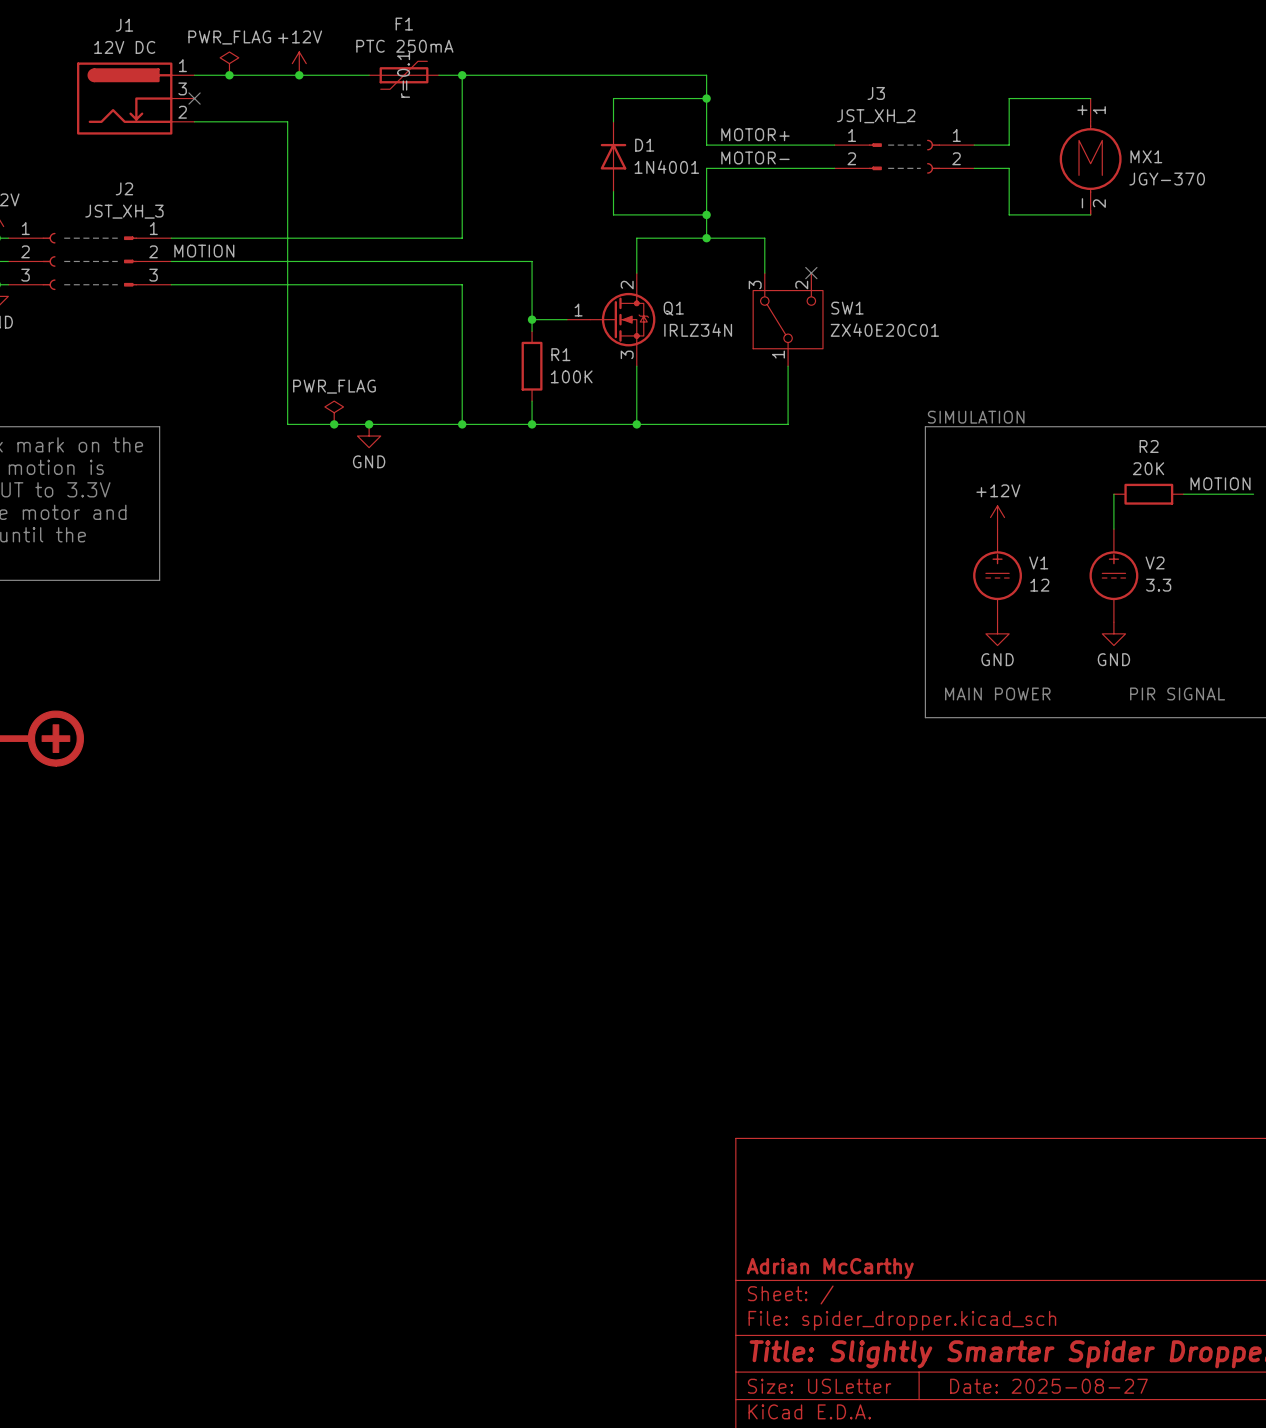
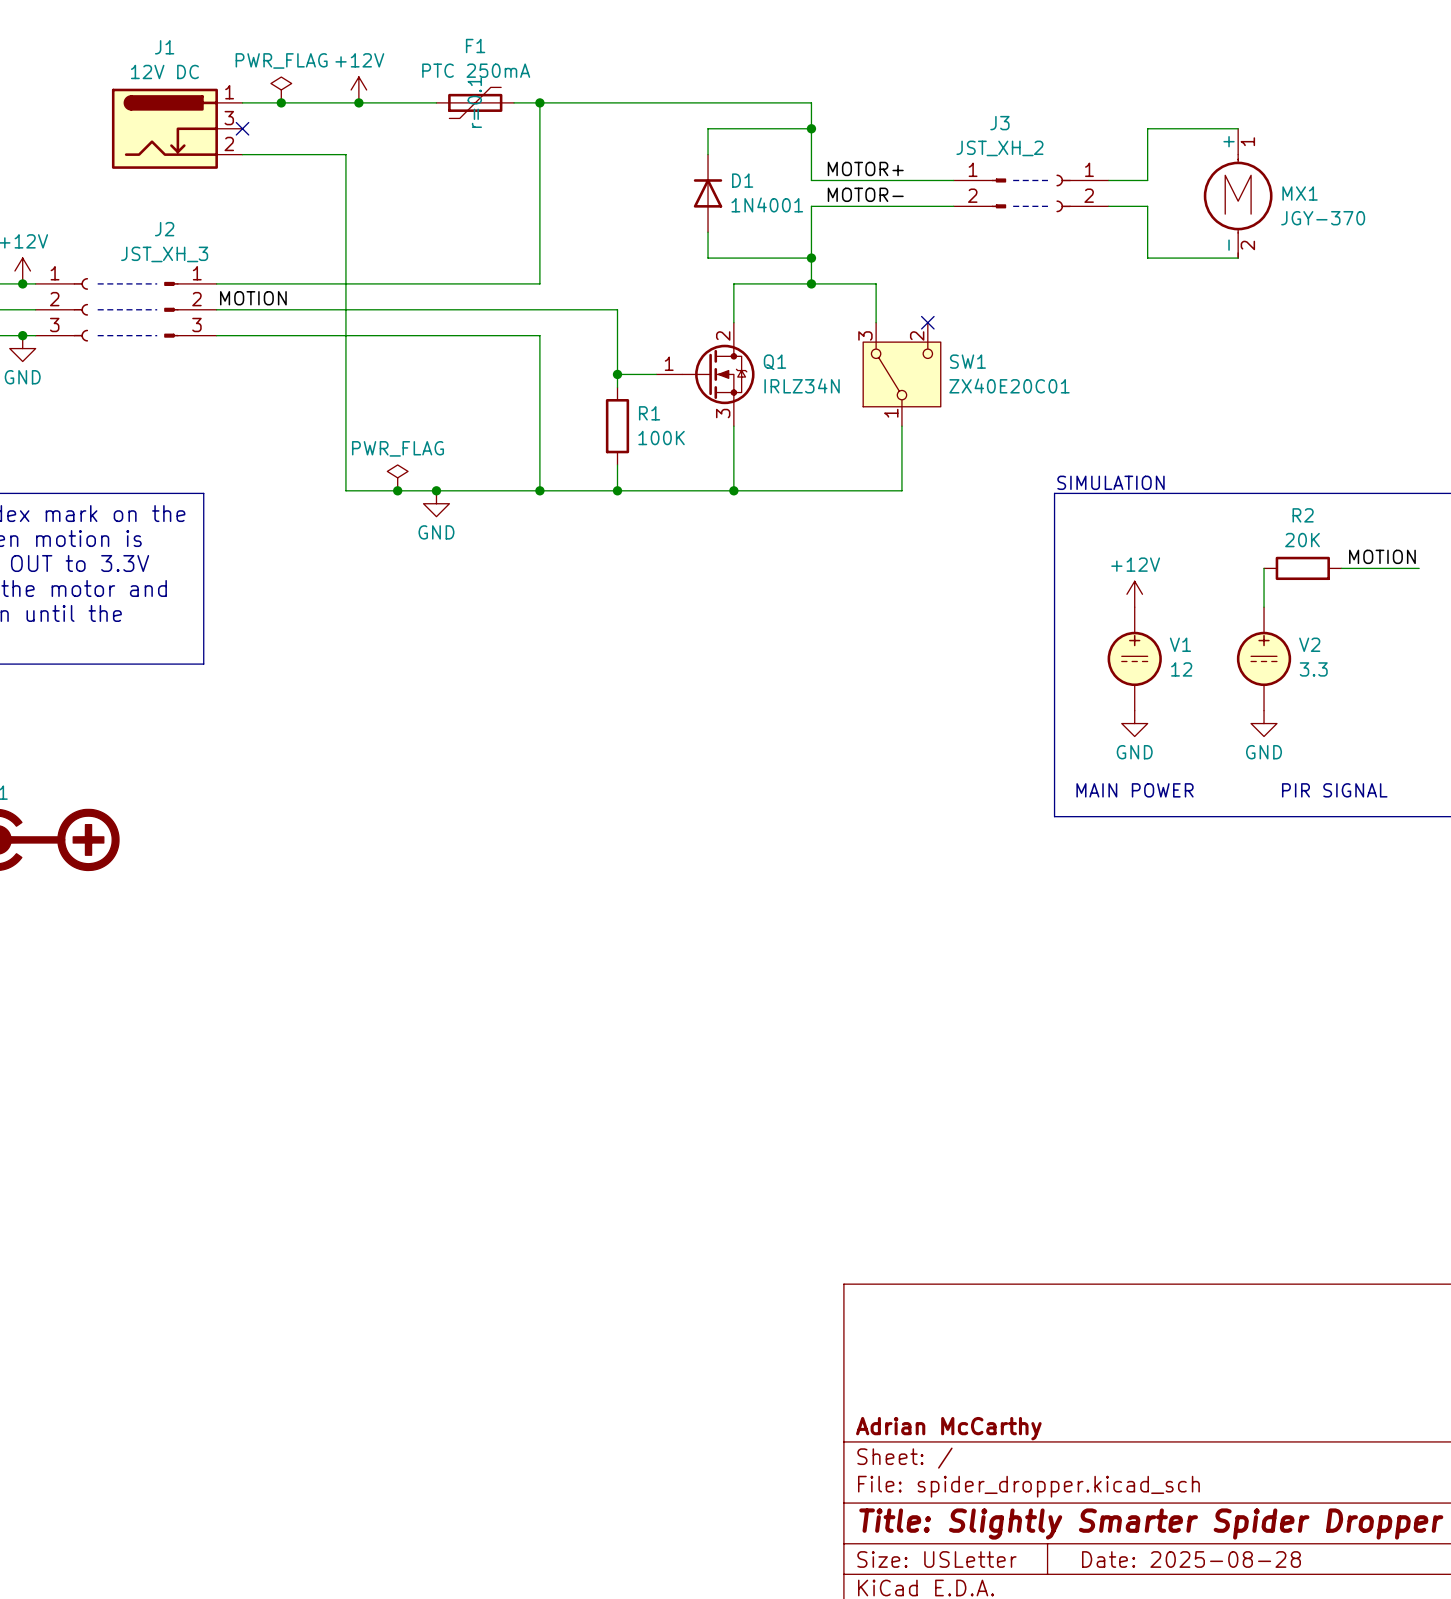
title block: Date: 2025-08-27 (1048, 1386) -> Date: 2025-08-28 (1191, 1559)

